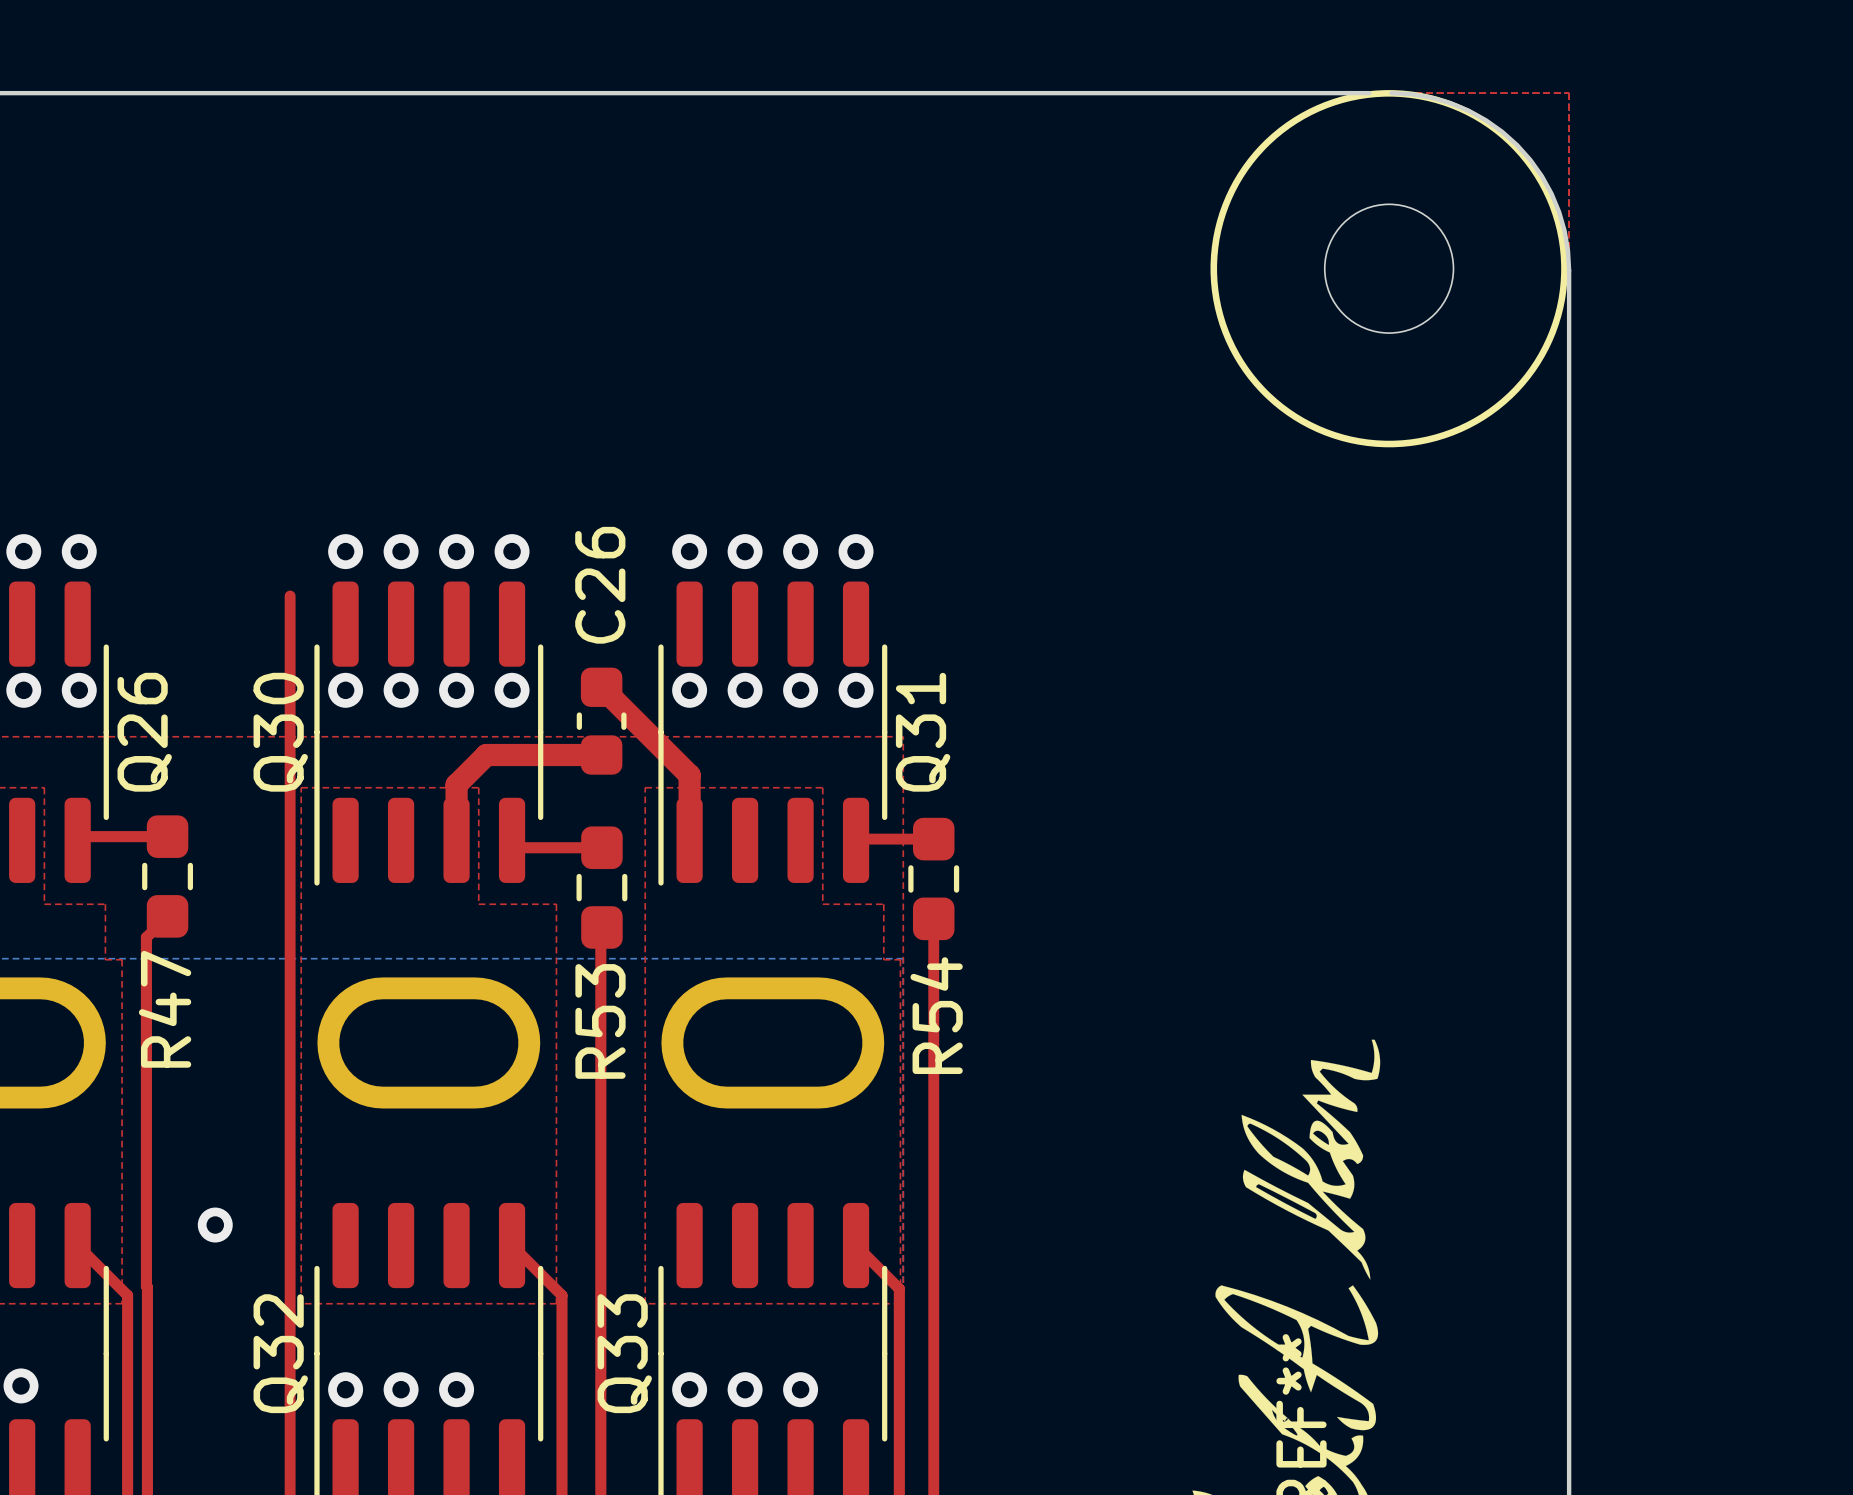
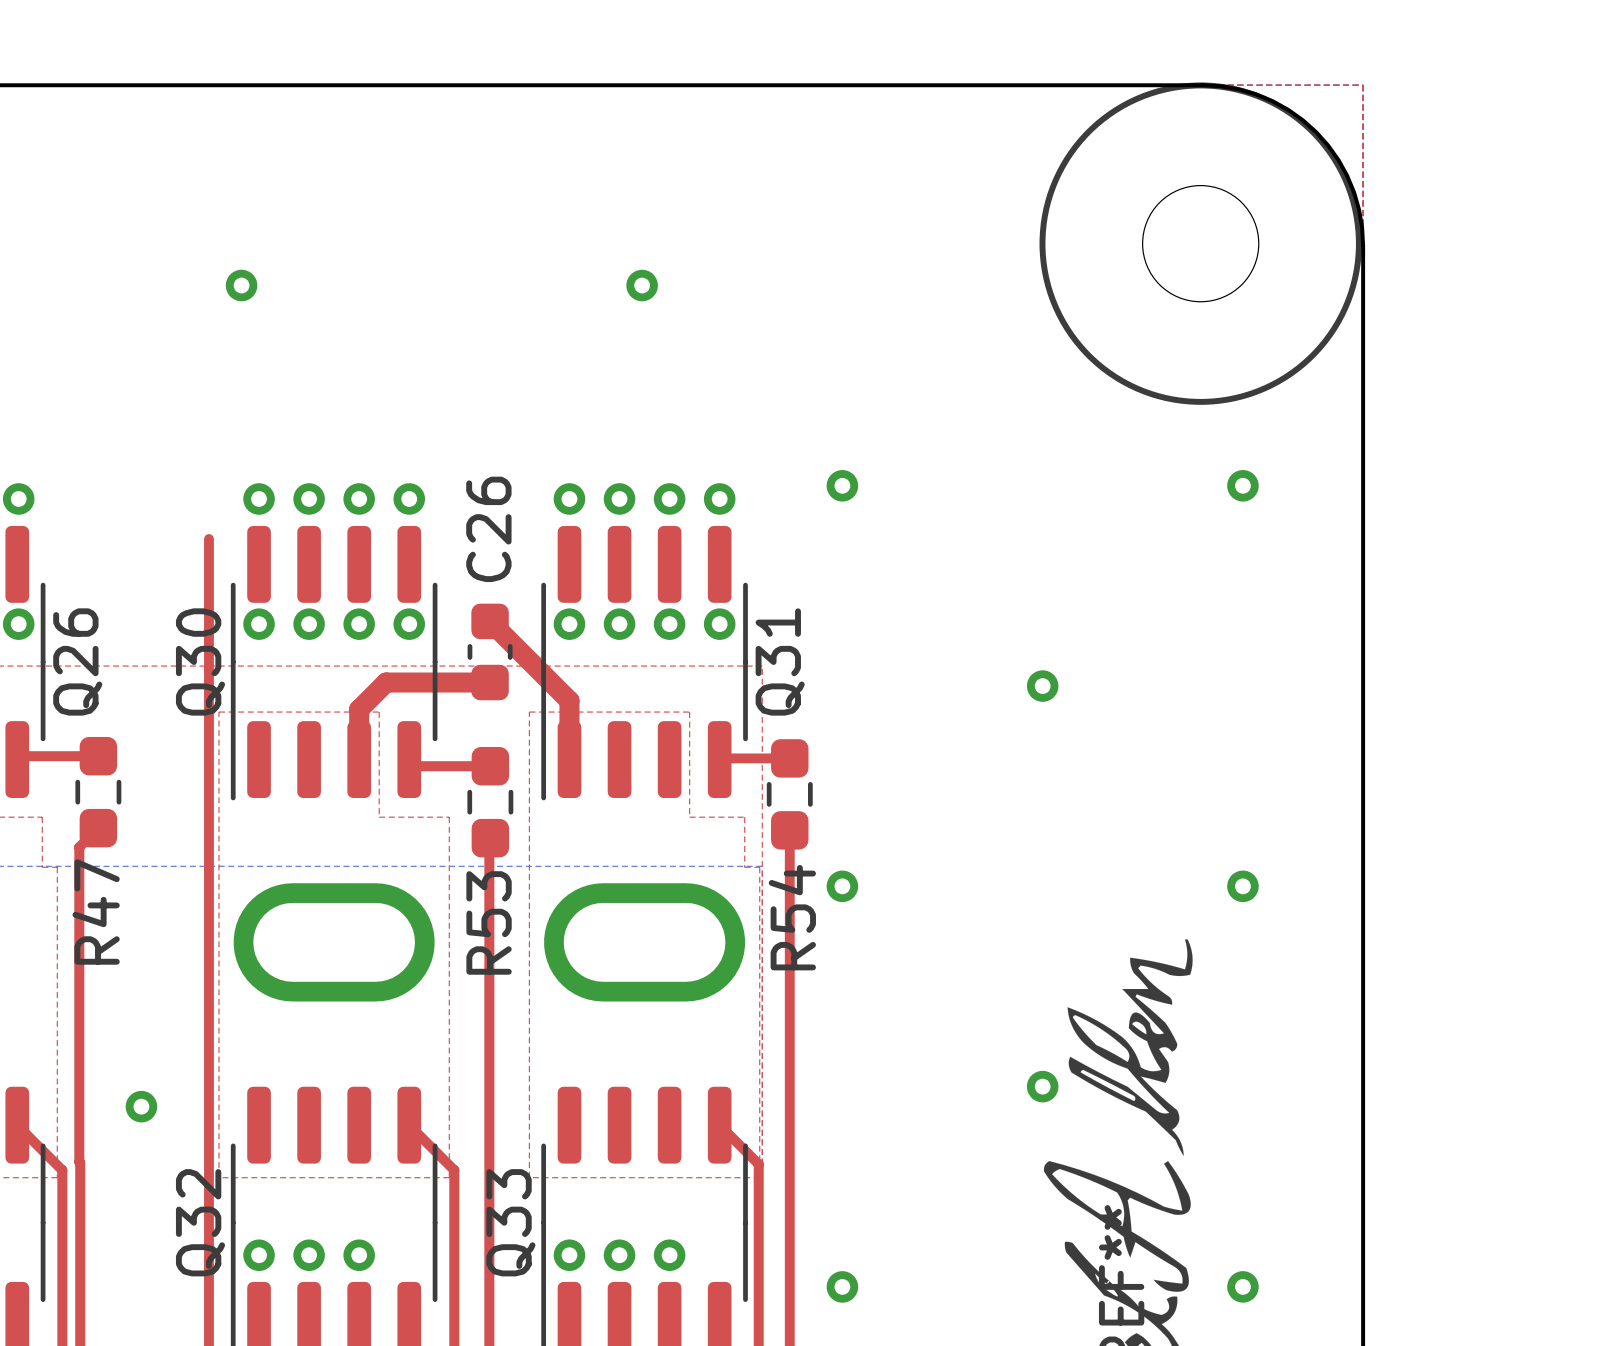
board edge: none -> (1182, 85) (1202, 85)
via: none -> (241, 285)
via: none -> (642, 285)
via: none -> (842, 485)
via: none -> (1242, 485)
via: none -> (1042, 686)
via: none -> (842, 886)
via: none -> (1242, 886)
via: none -> (1042, 1086)
via: none -> (842, 1286)
via: none -> (1242, 1286)

